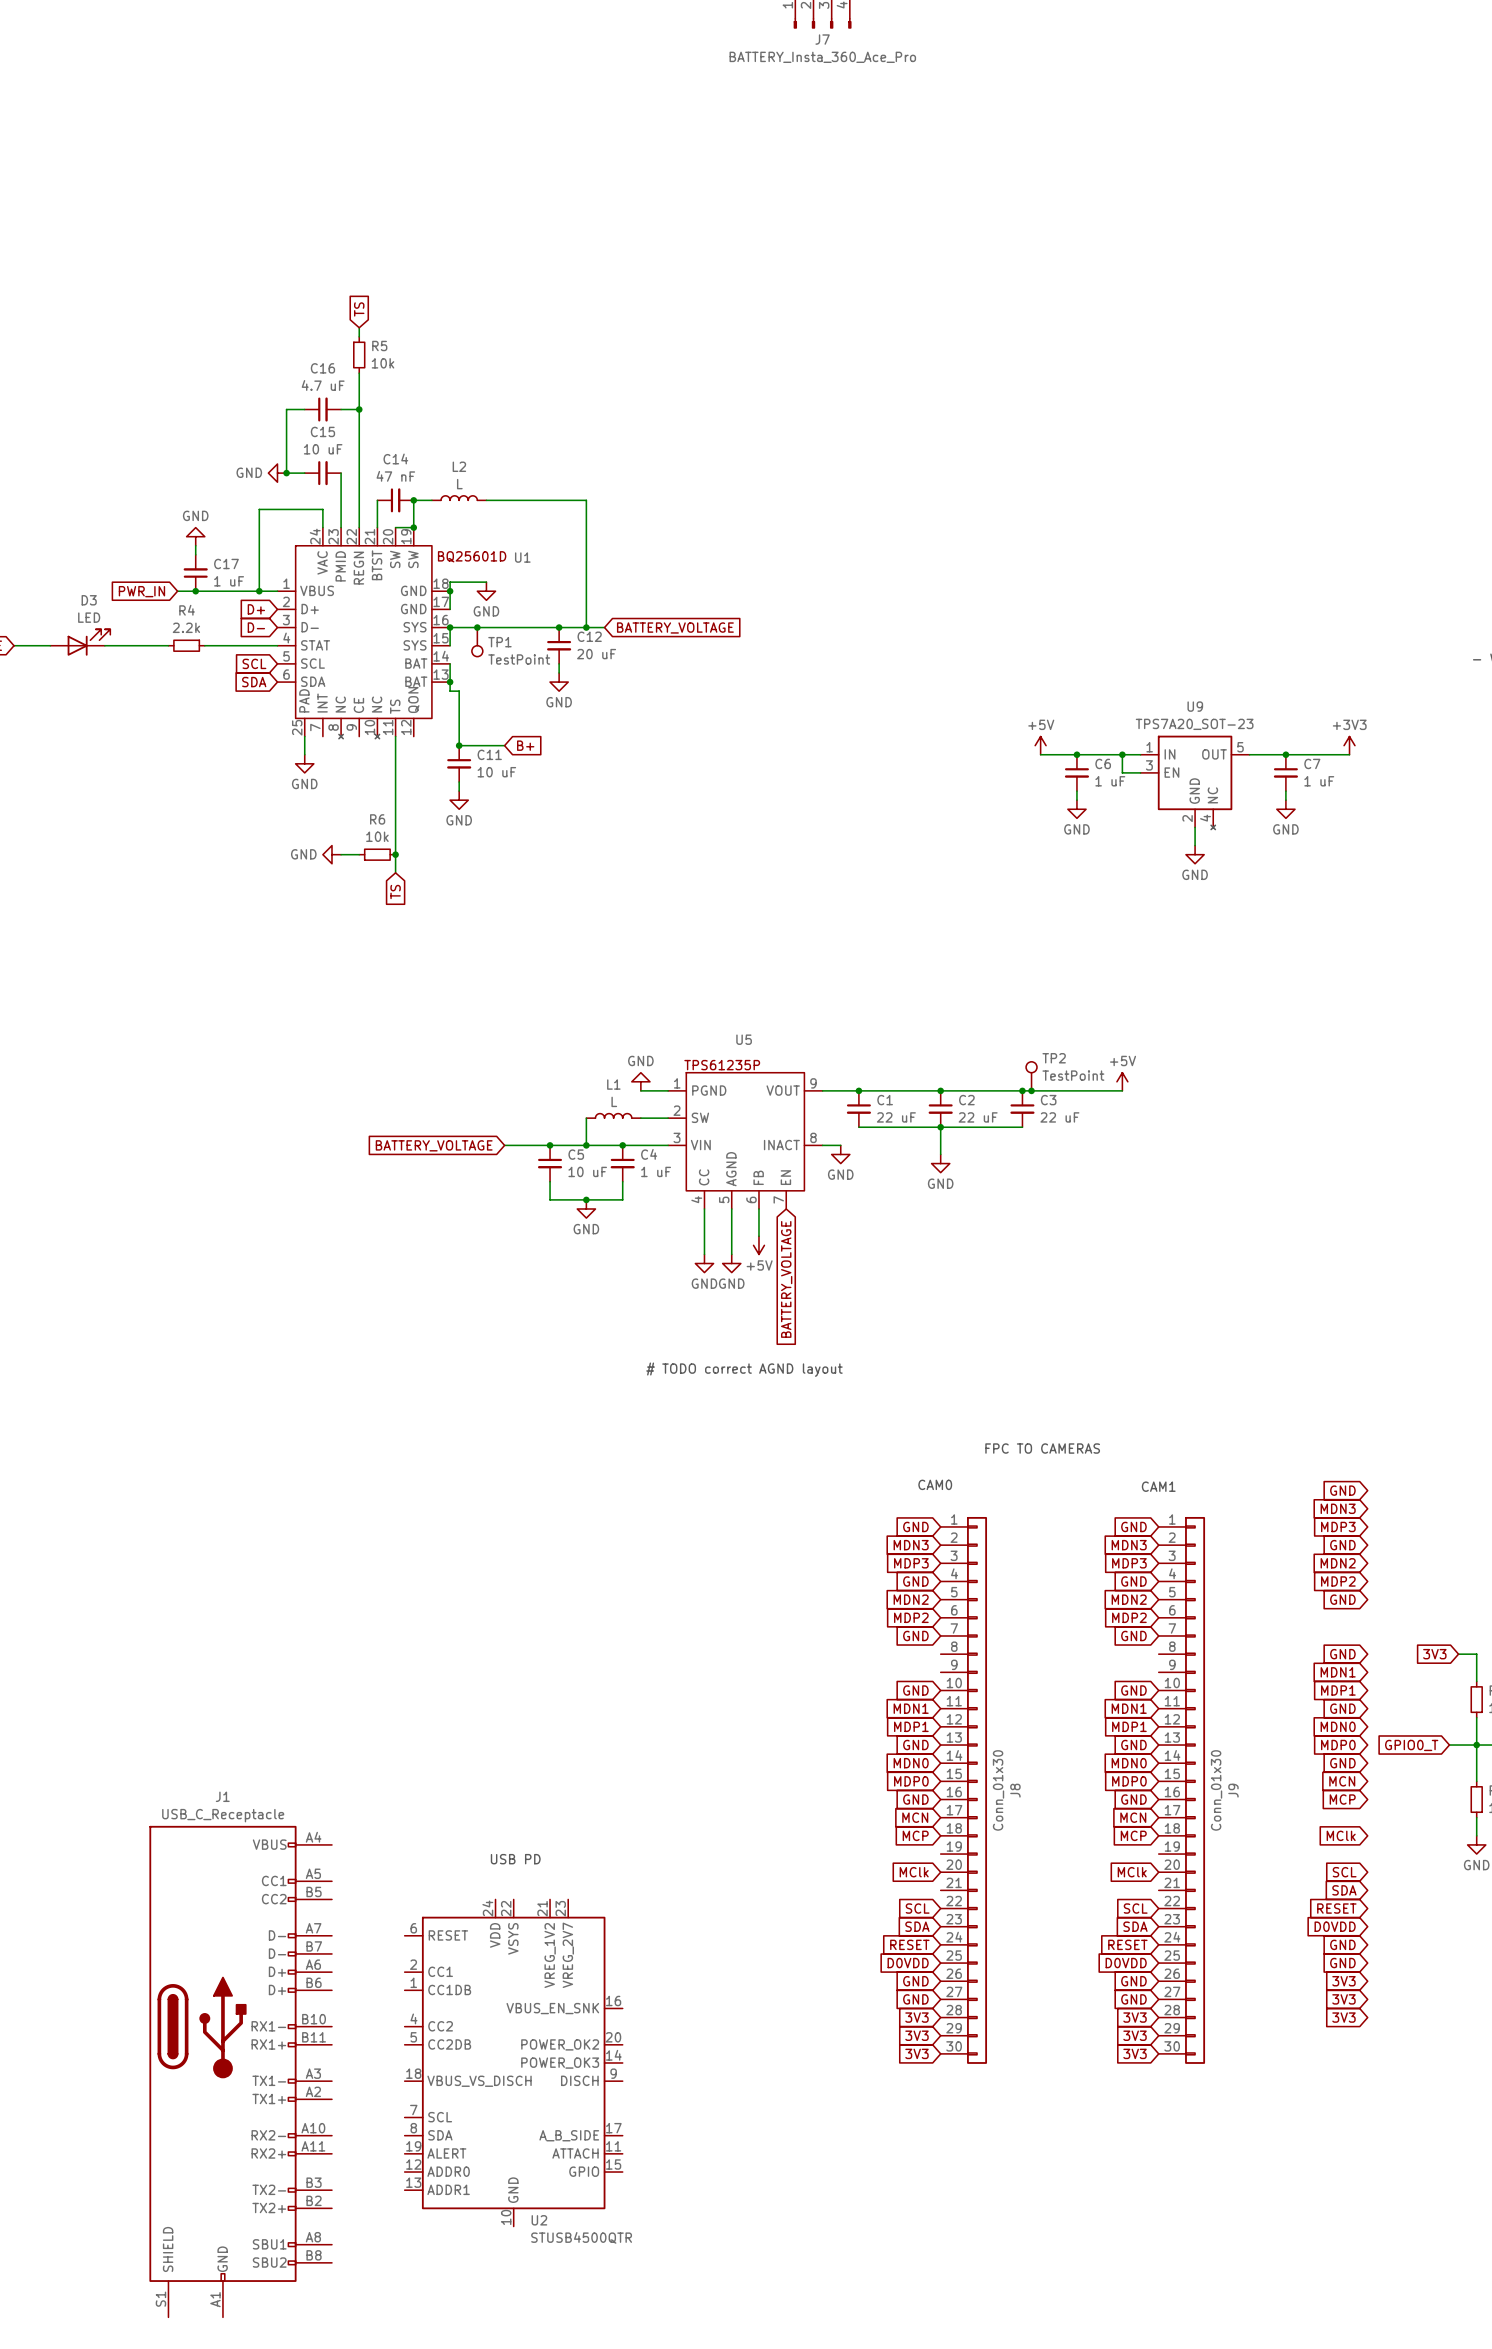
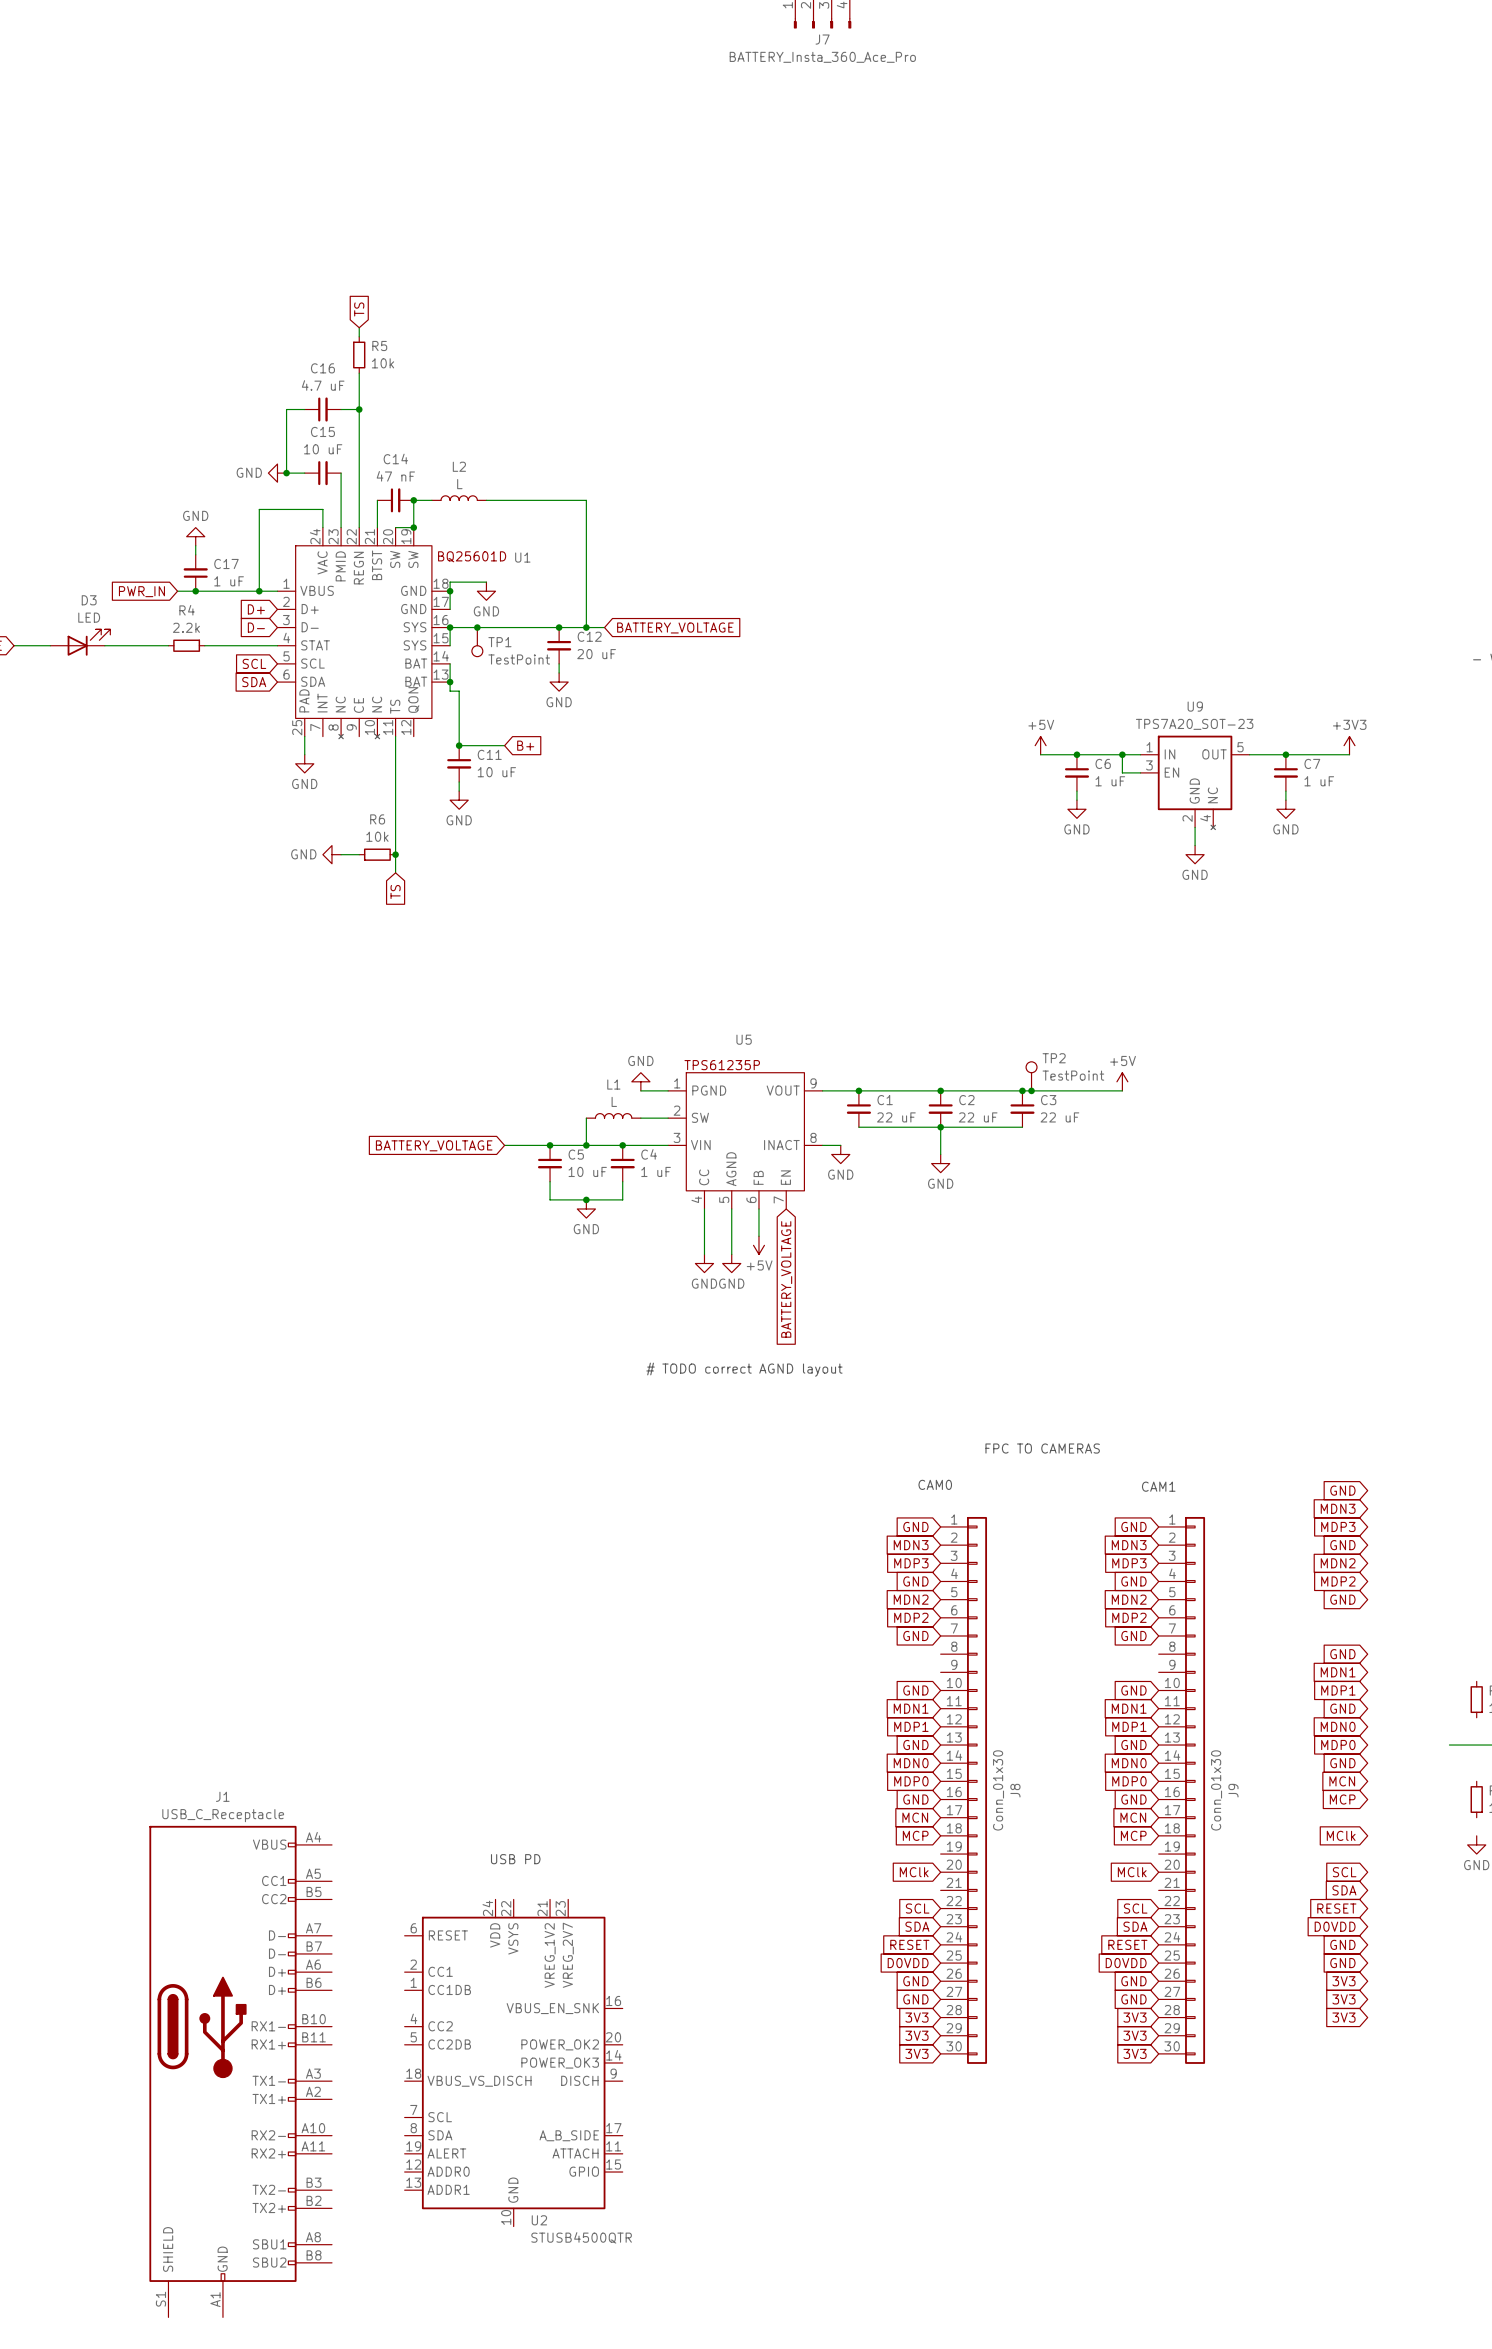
global label: 3V3 (1434, 1654) -> none
wire: (1458, 1654) (1476, 1654) (1476, 1681) -> none
wire: (1476, 1717) (1476, 1781) -> none
global label: GPIO0_T (1411, 1745) -> none
junction: (1476, 1745) -> none
wire: (1476, 1817) (1476, 1835) -> none

